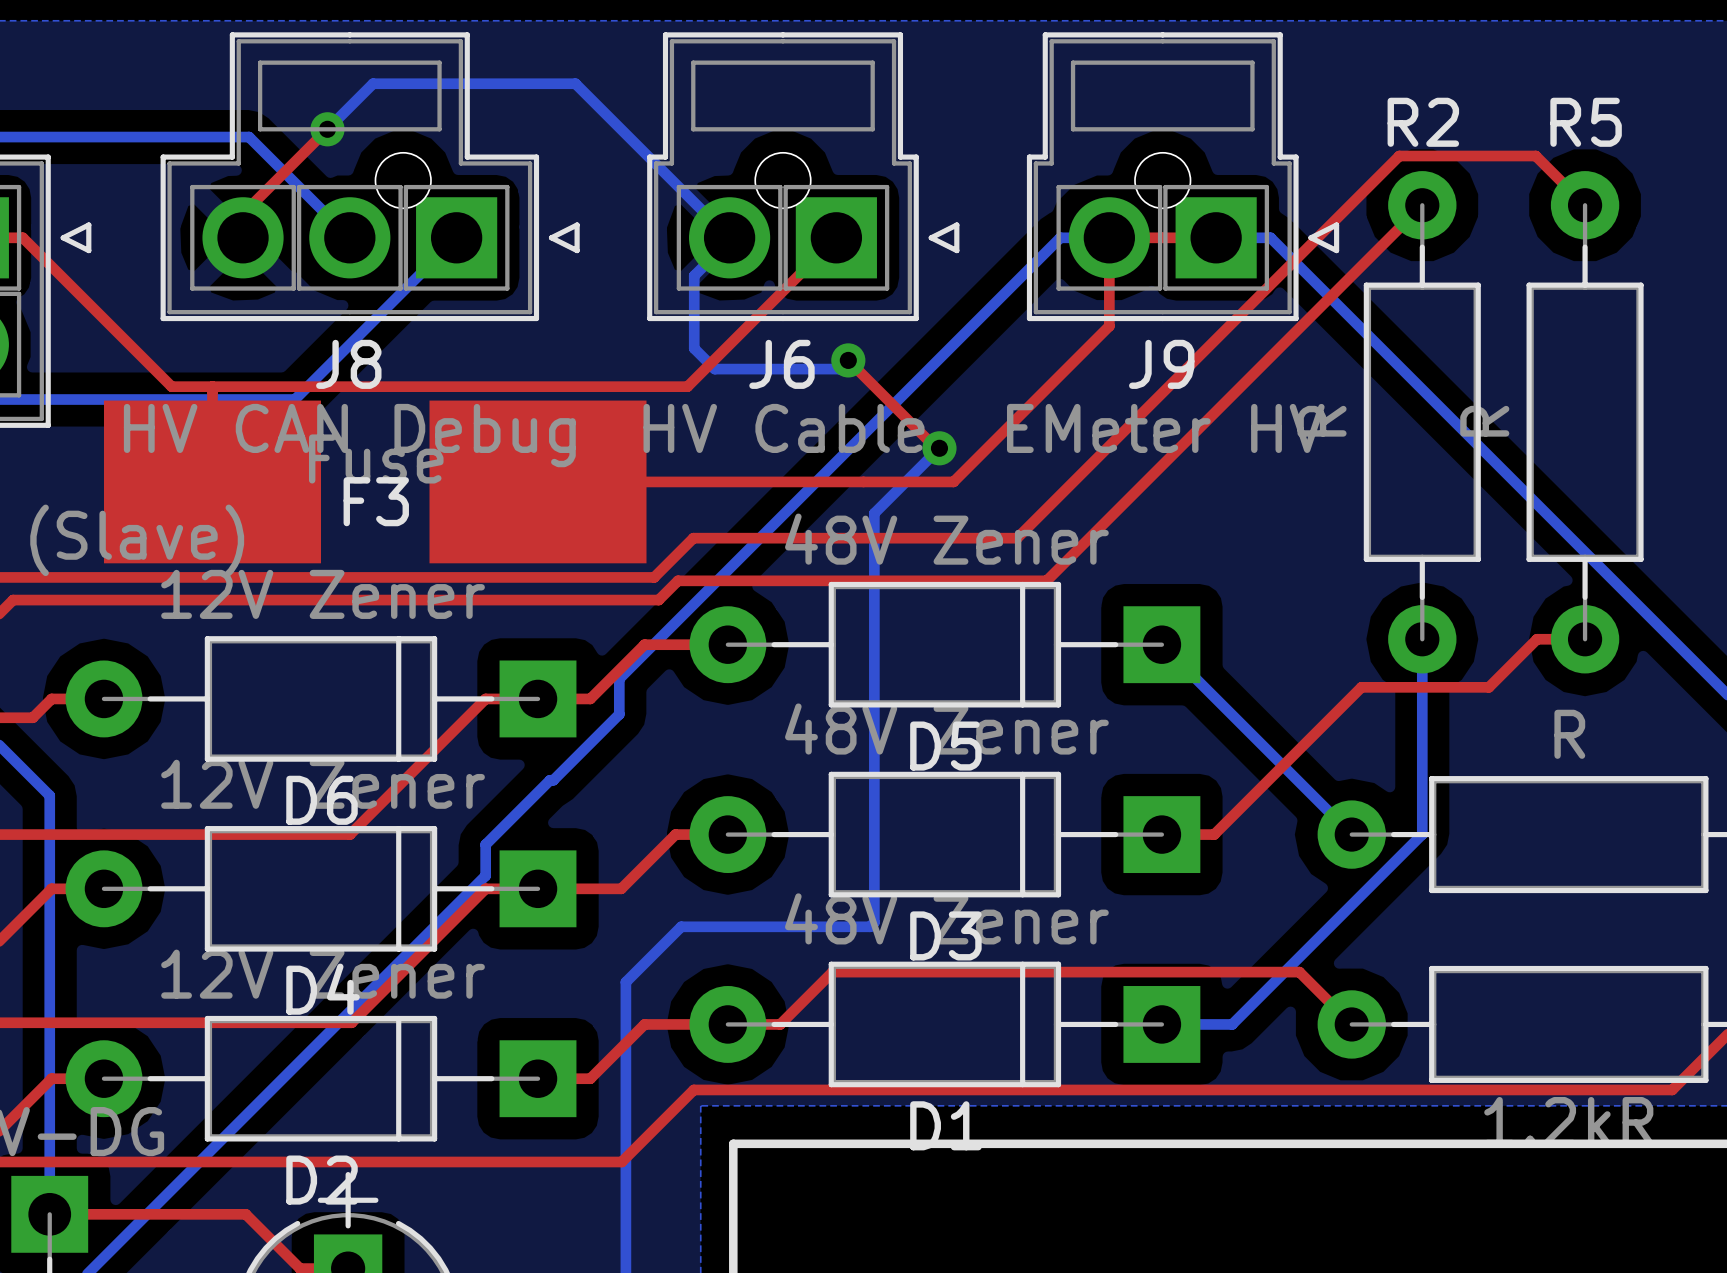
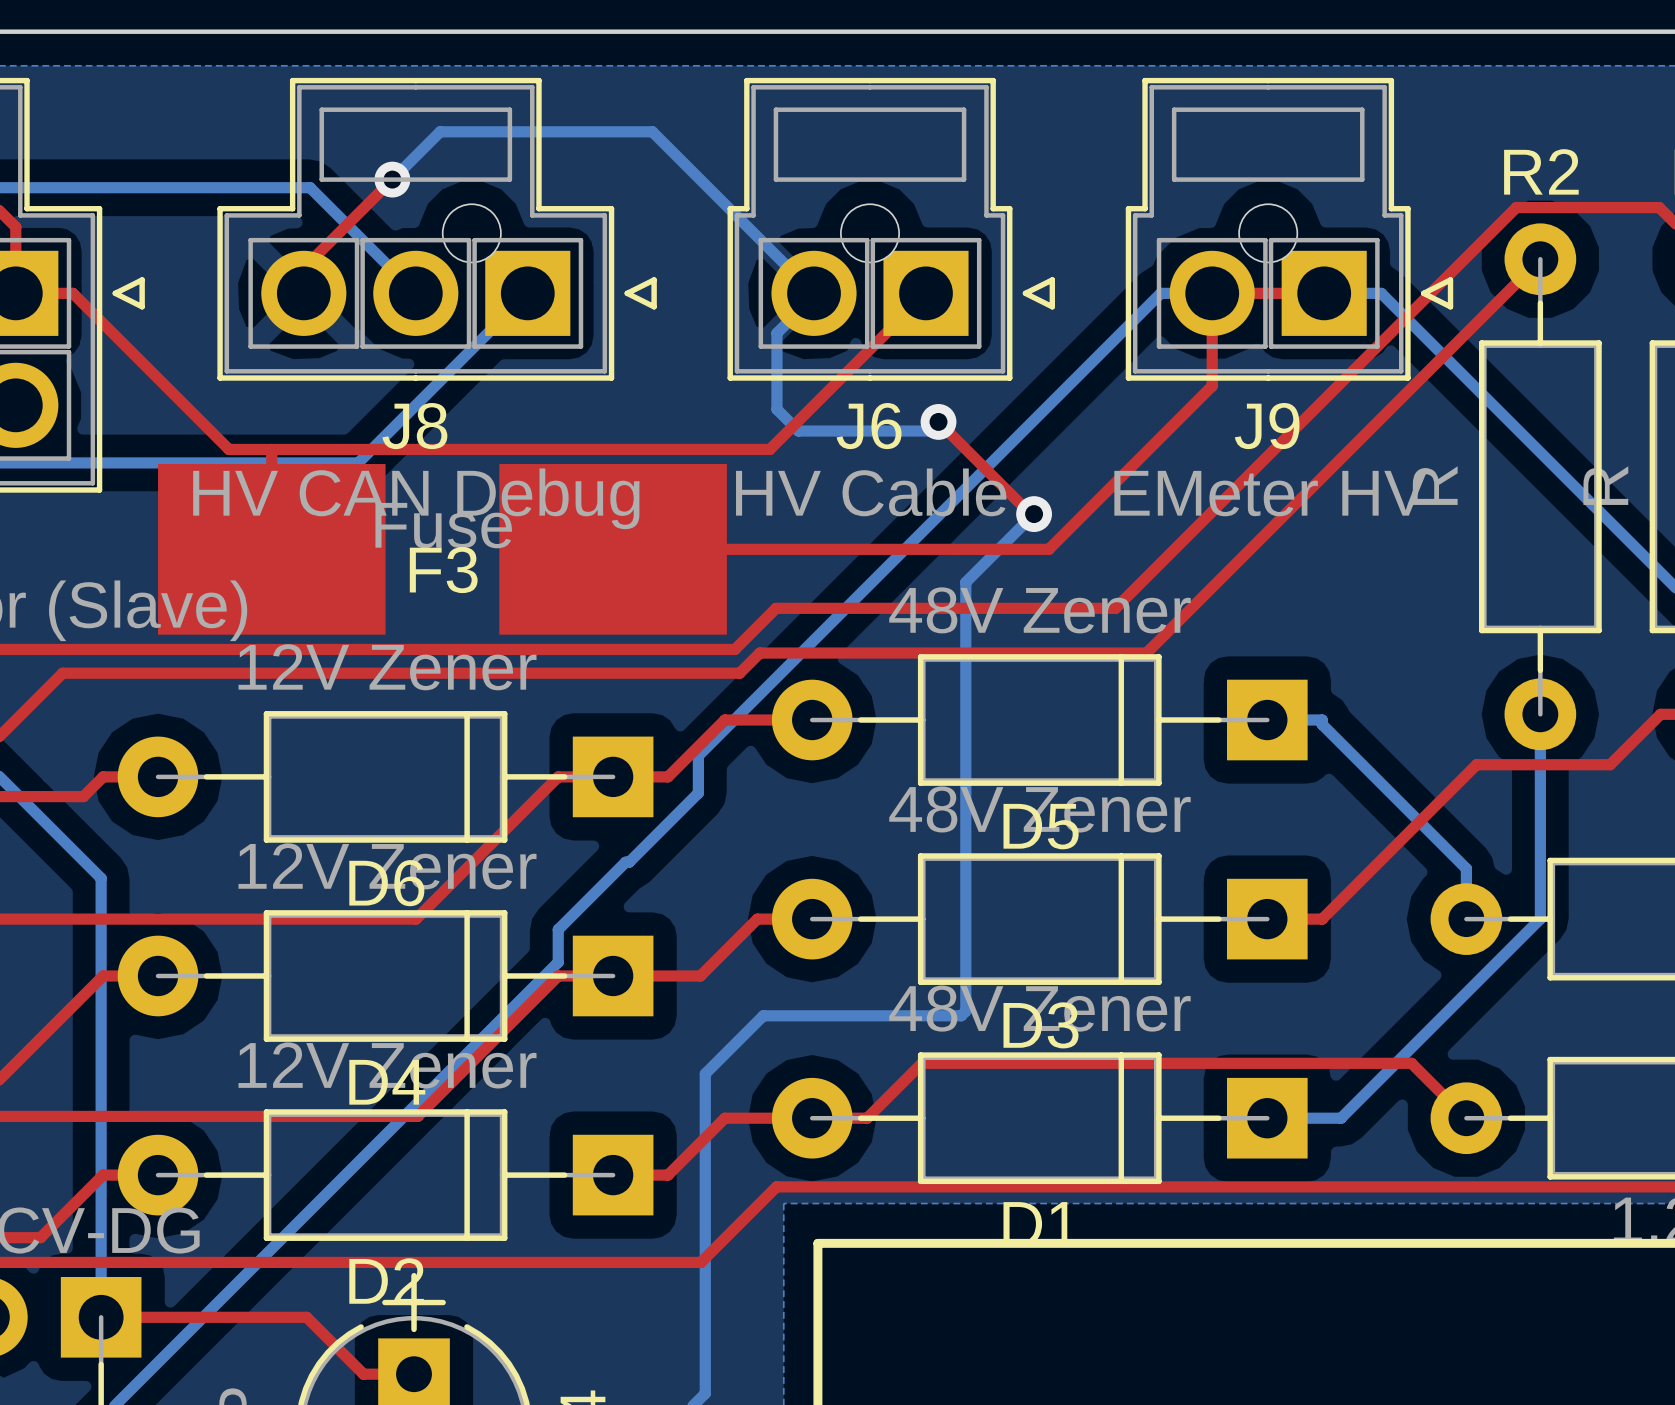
bottom track: (1161, 644) (1351, 834) -> (1267, 720) (1322, 720) (1322, 724) (1466, 868) (1466, 919)

